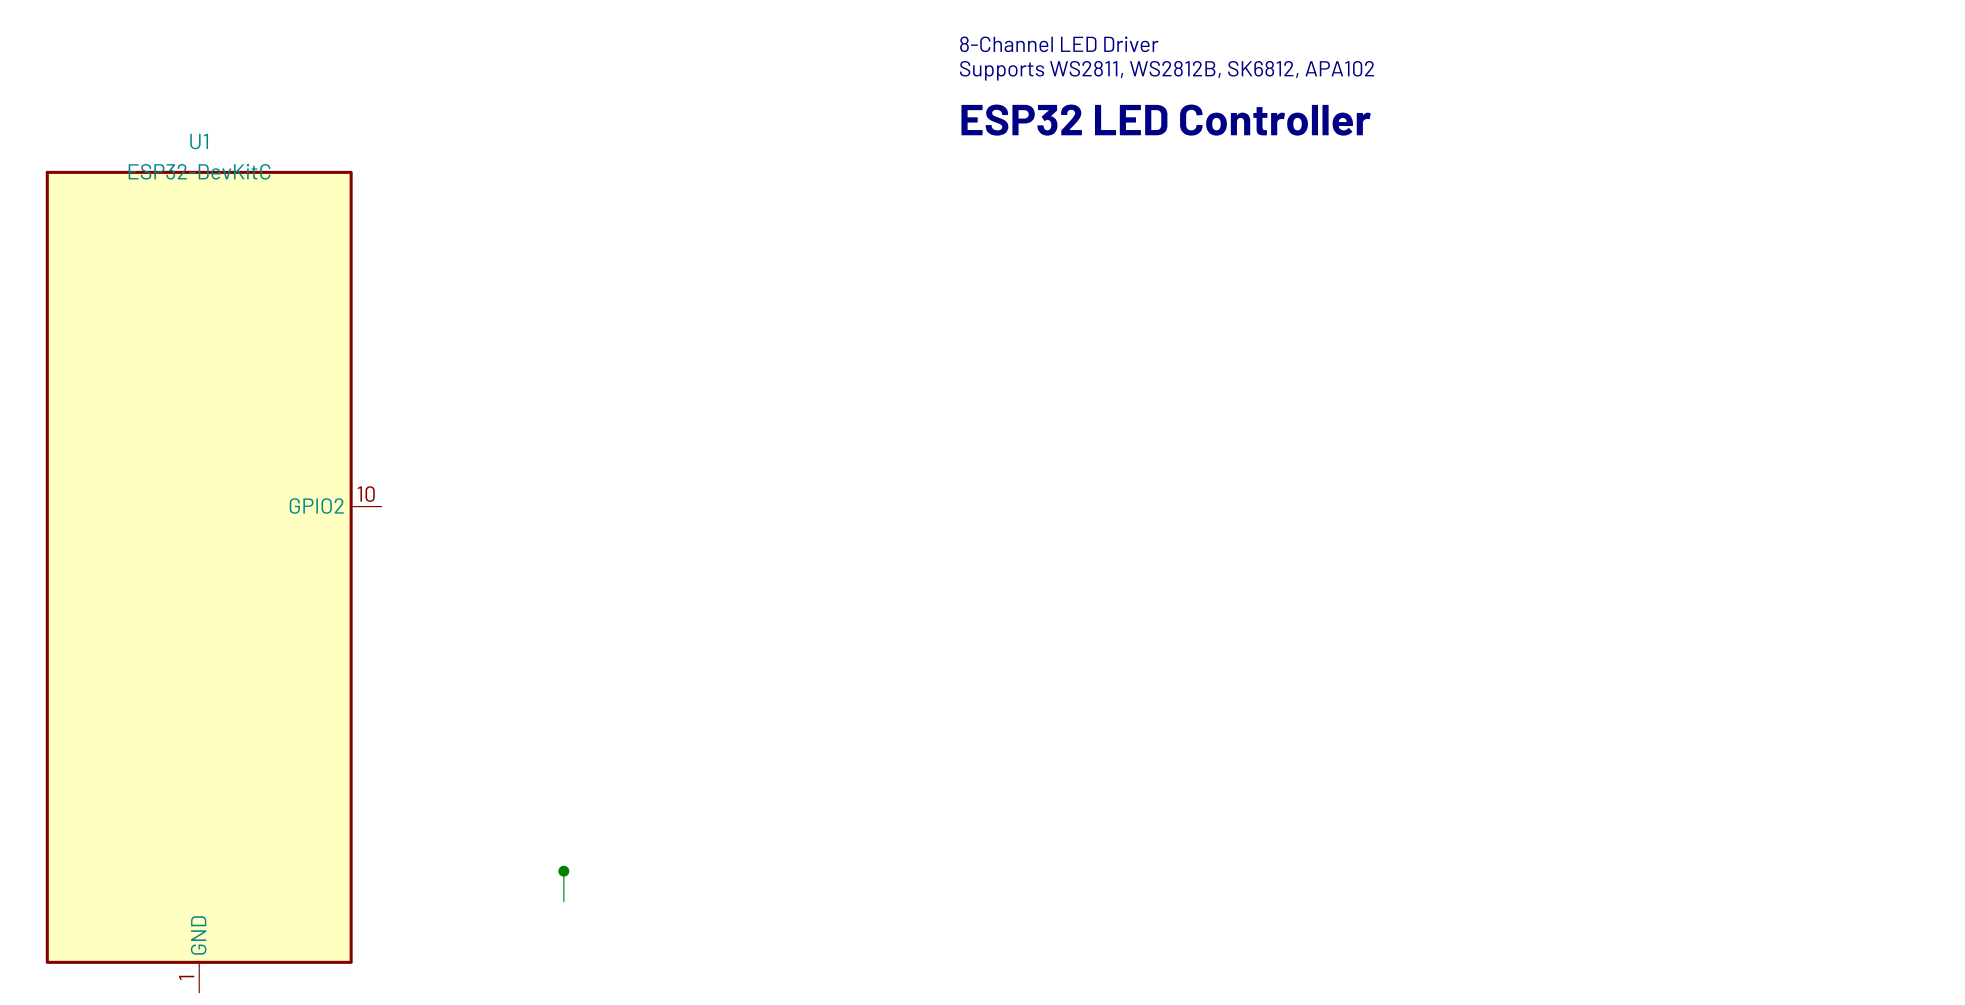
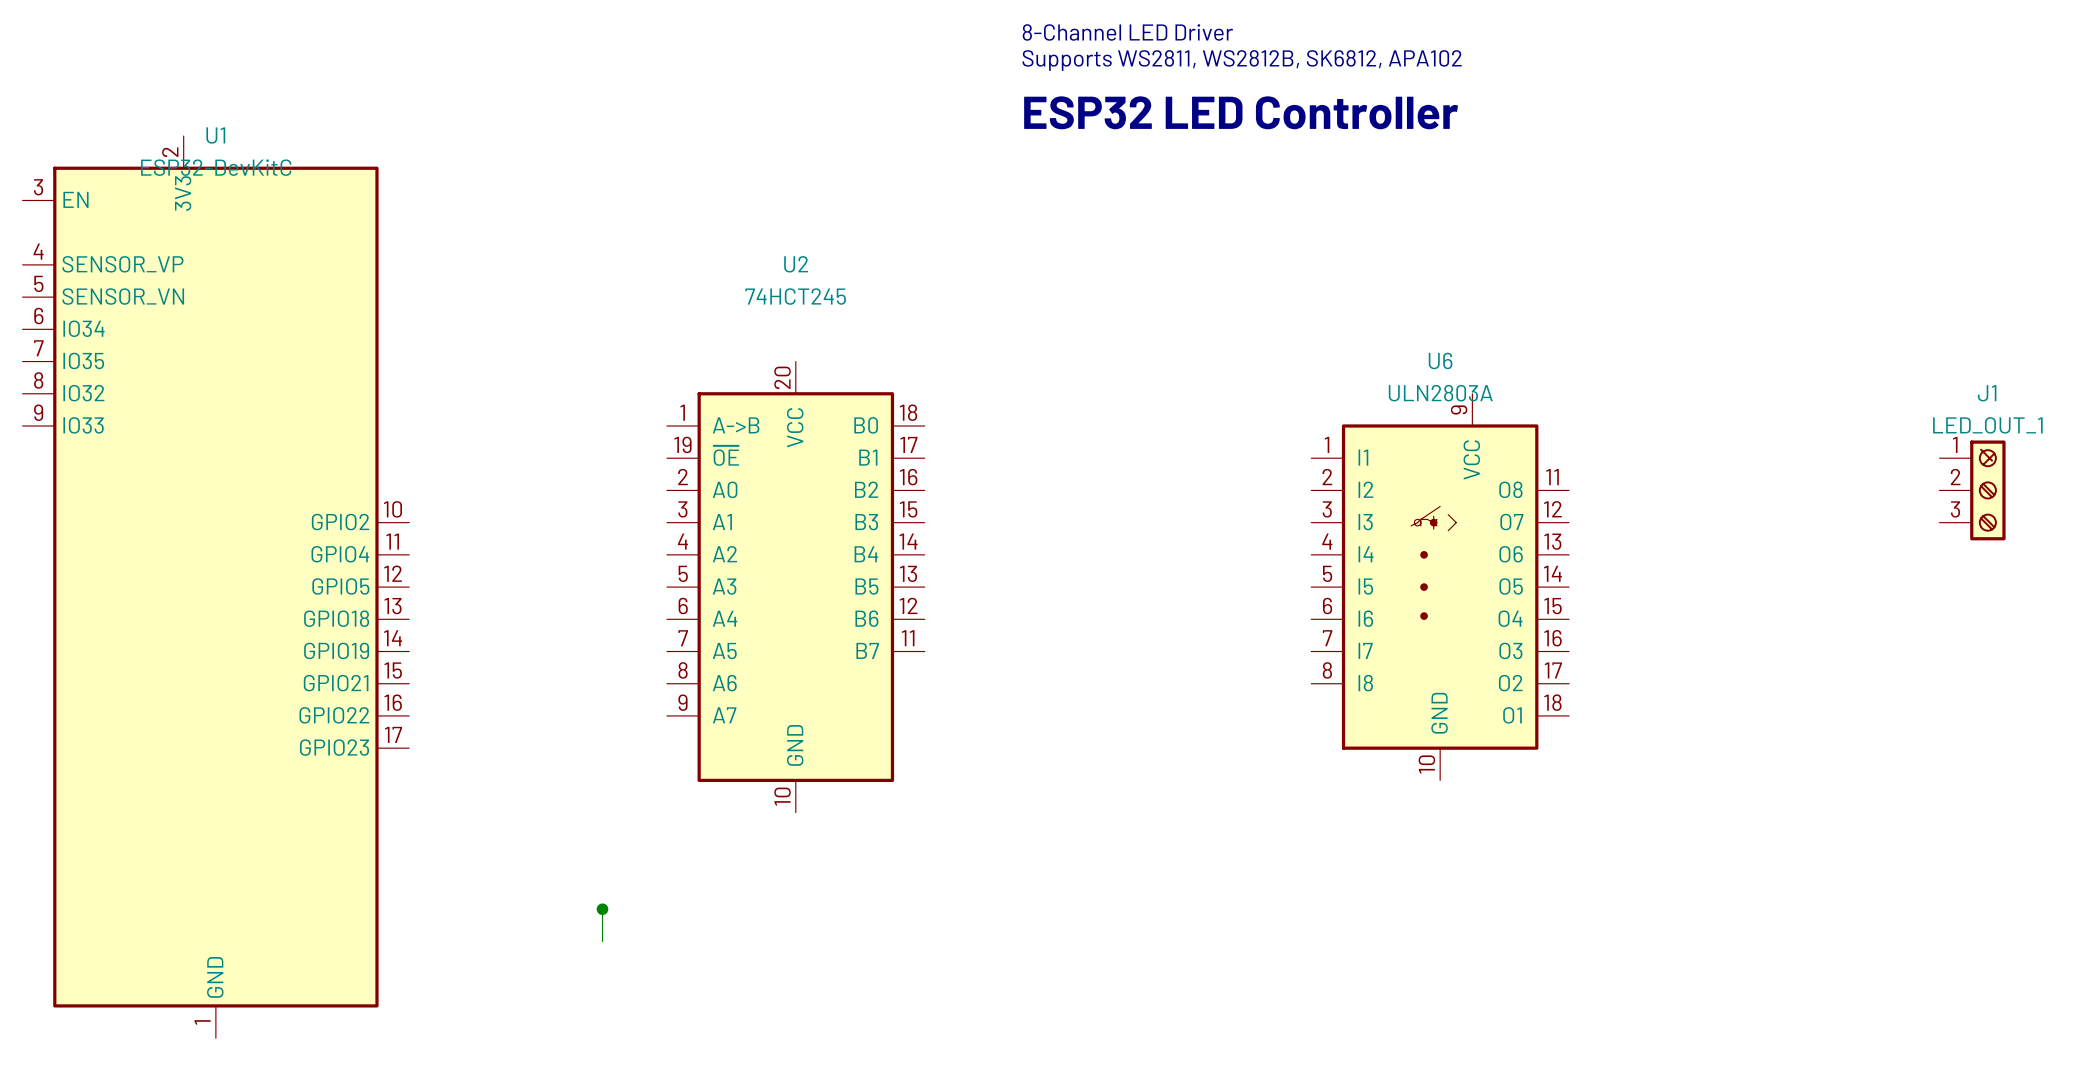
U1 symbol: [45, 170, 382, 993] -> [22, 136, 410, 1039]
J1: none -> LED_OUT_1 (1972, 490)
U2: none -> 74HCT245 (795, 587)
U6: none -> ULN2803A (1440, 587)

